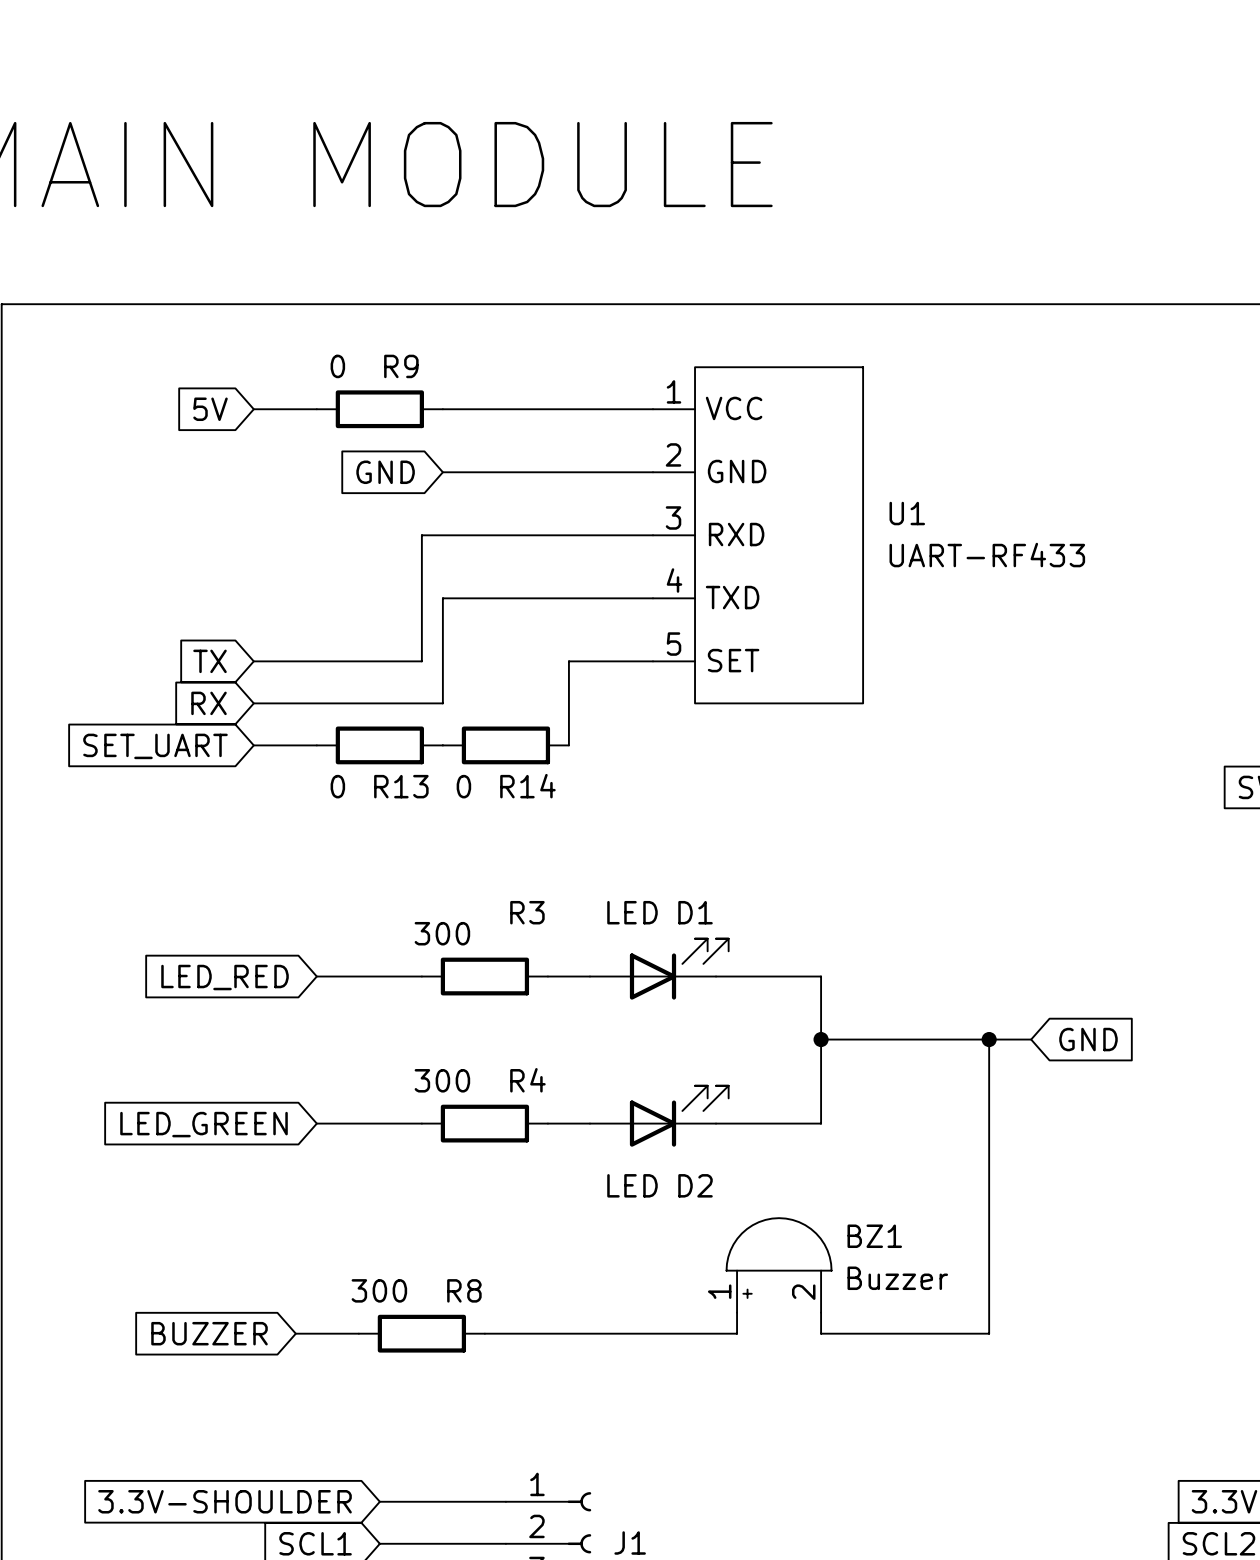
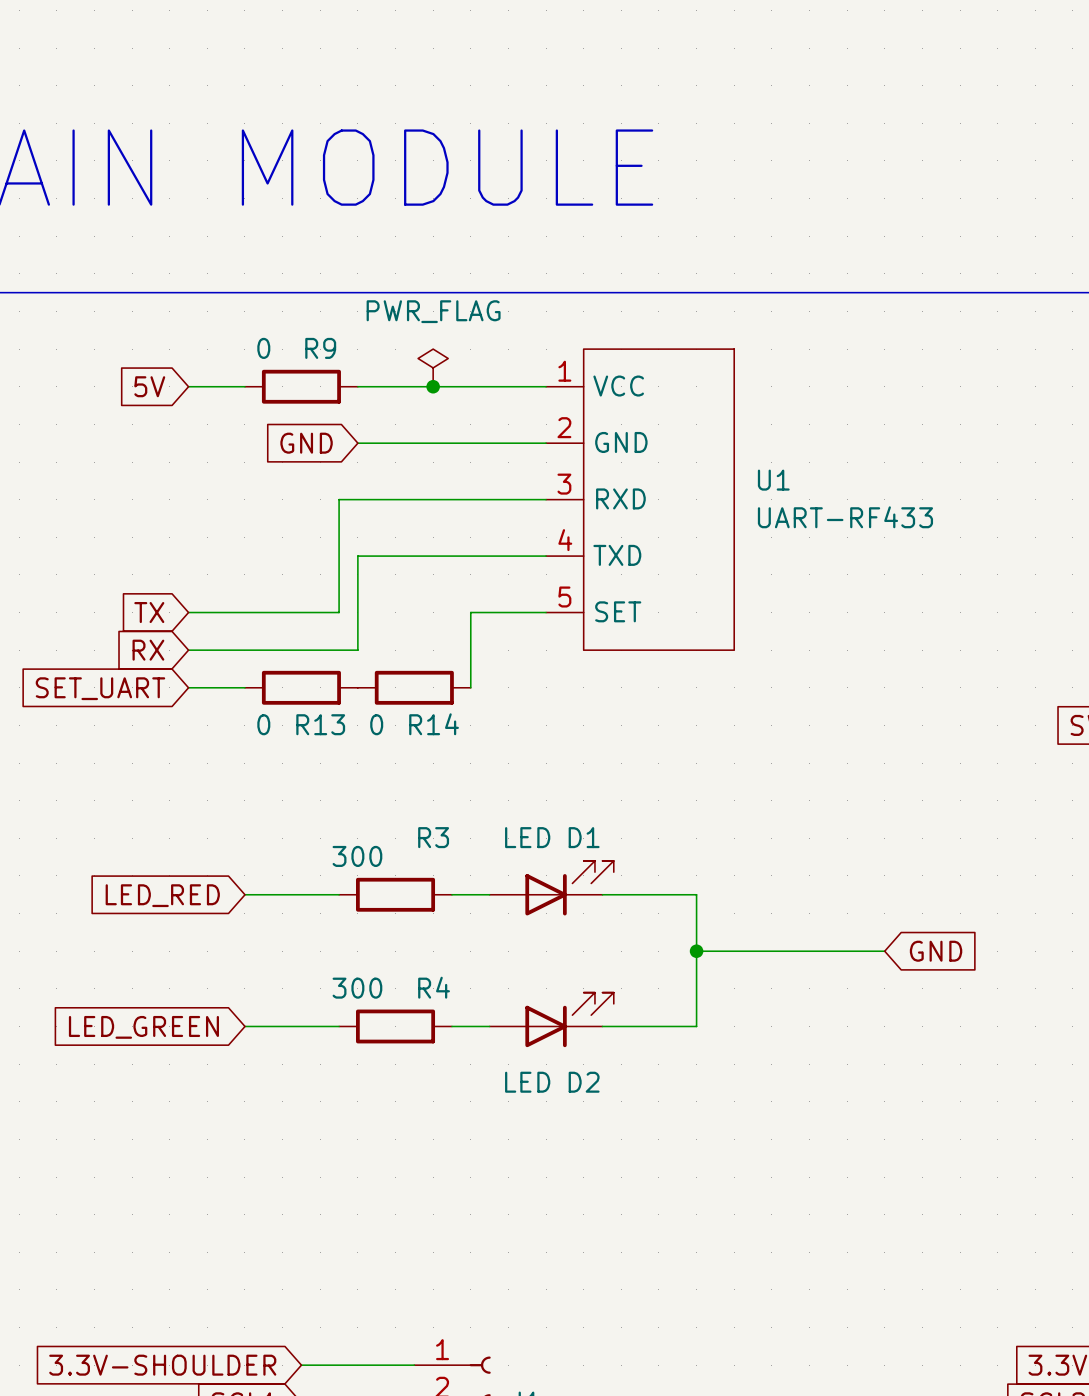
power symbol: none -> PWR_FLAG (433, 367)
junction: none -> (433, 386)
wire: (989, 1039) (989, 1333) (821, 1333) (821, 1312) -> none
junction: (989, 1039) -> none
BZ1: Buzzer (779, 1265) -> none
wire: (737, 1312) (737, 1333) (484, 1333) -> none
global label: BUZZER (209, 1333) -> none
wire: (295, 1333) (358, 1333) -> none
R8: 300 (421, 1333) -> none

